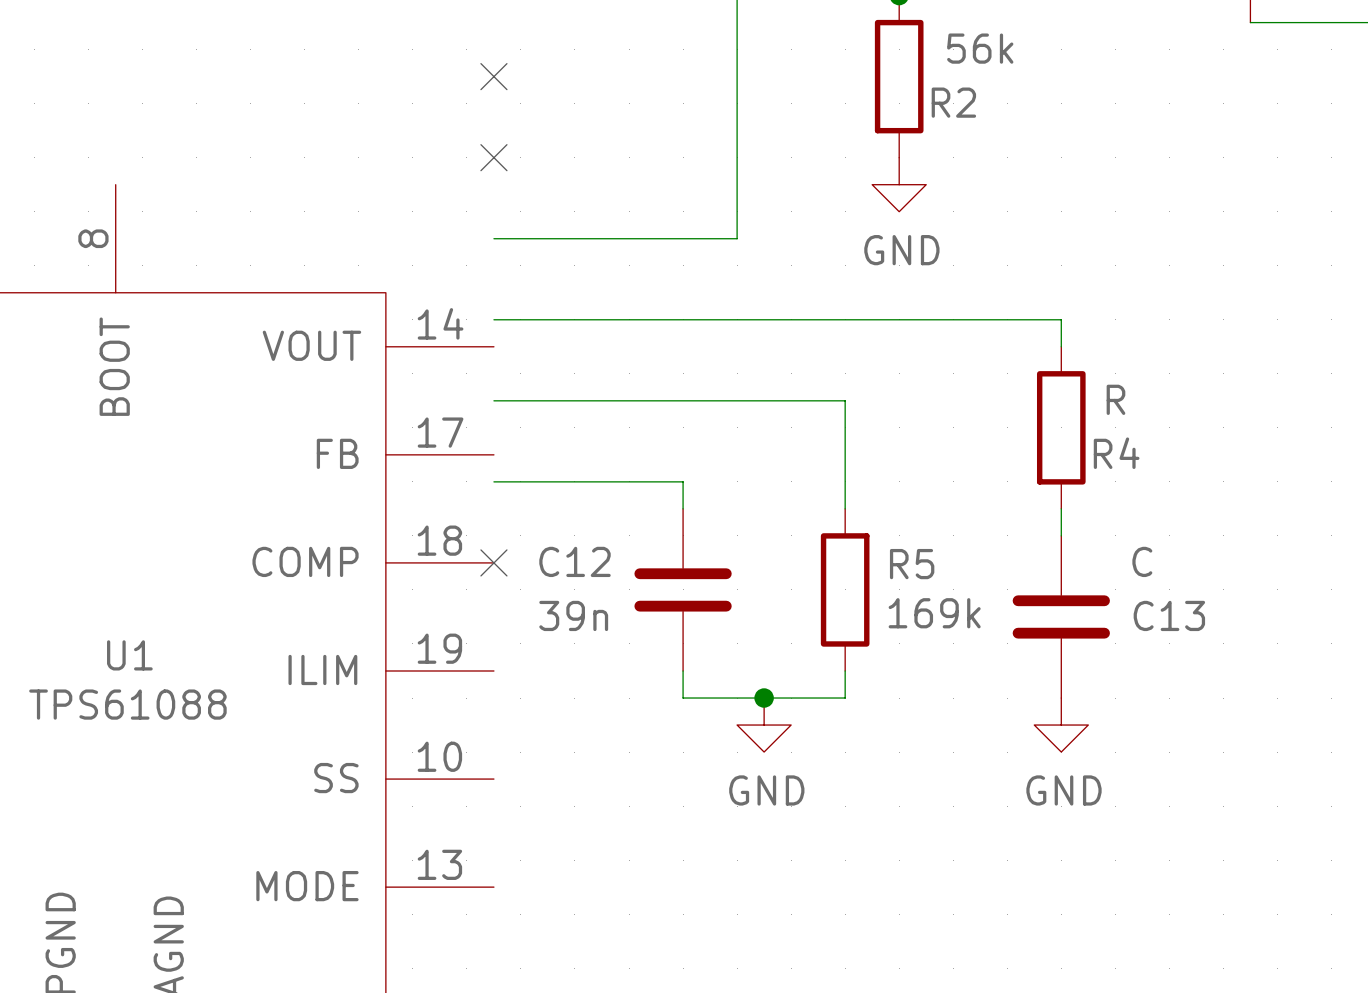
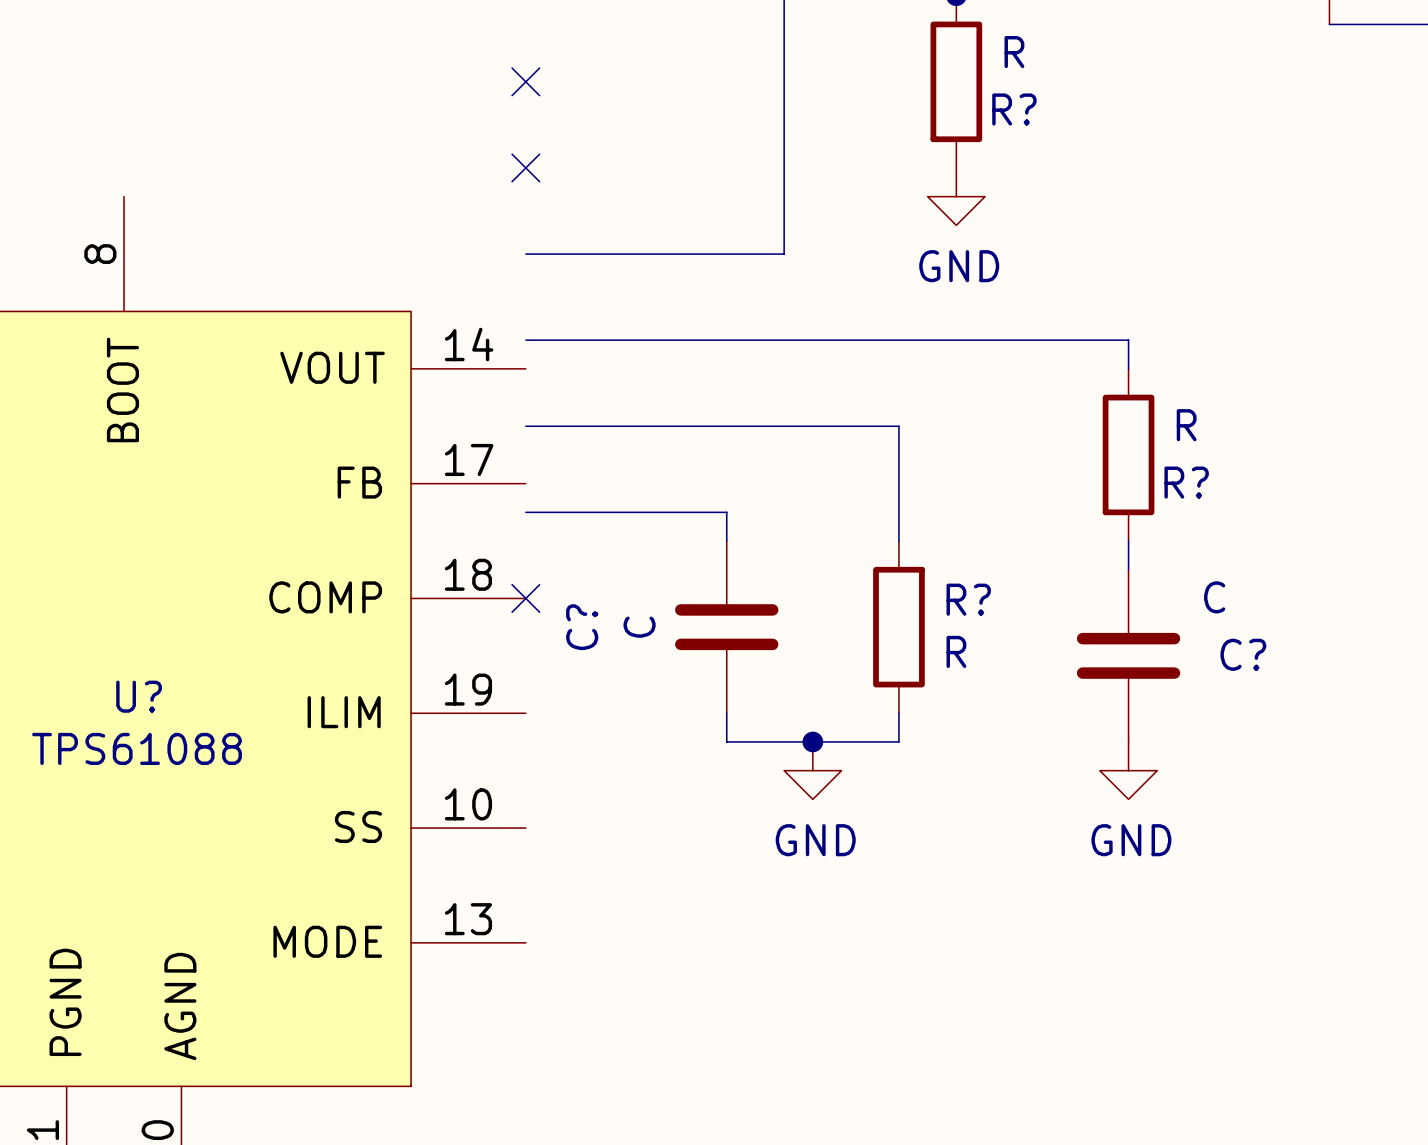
R2 value: 56k (980, 48) -> R (1014, 52)
R2 name: R2 (953, 102) -> R? (1014, 109)
R4 name: R4 (1116, 453) -> R? (1186, 482)
C12 name: C12 (574, 561) -> C? (582, 627)
R5 name: R5 (912, 564) -> R? (968, 599)
R5 value: 169k (934, 613) -> R (956, 651)
C12 value: 39n (573, 615) -> C (639, 627)
C13 name: C13 (1169, 615) -> C? (1243, 654)
U1 name: U1 (129, 655) -> U? (139, 696)

